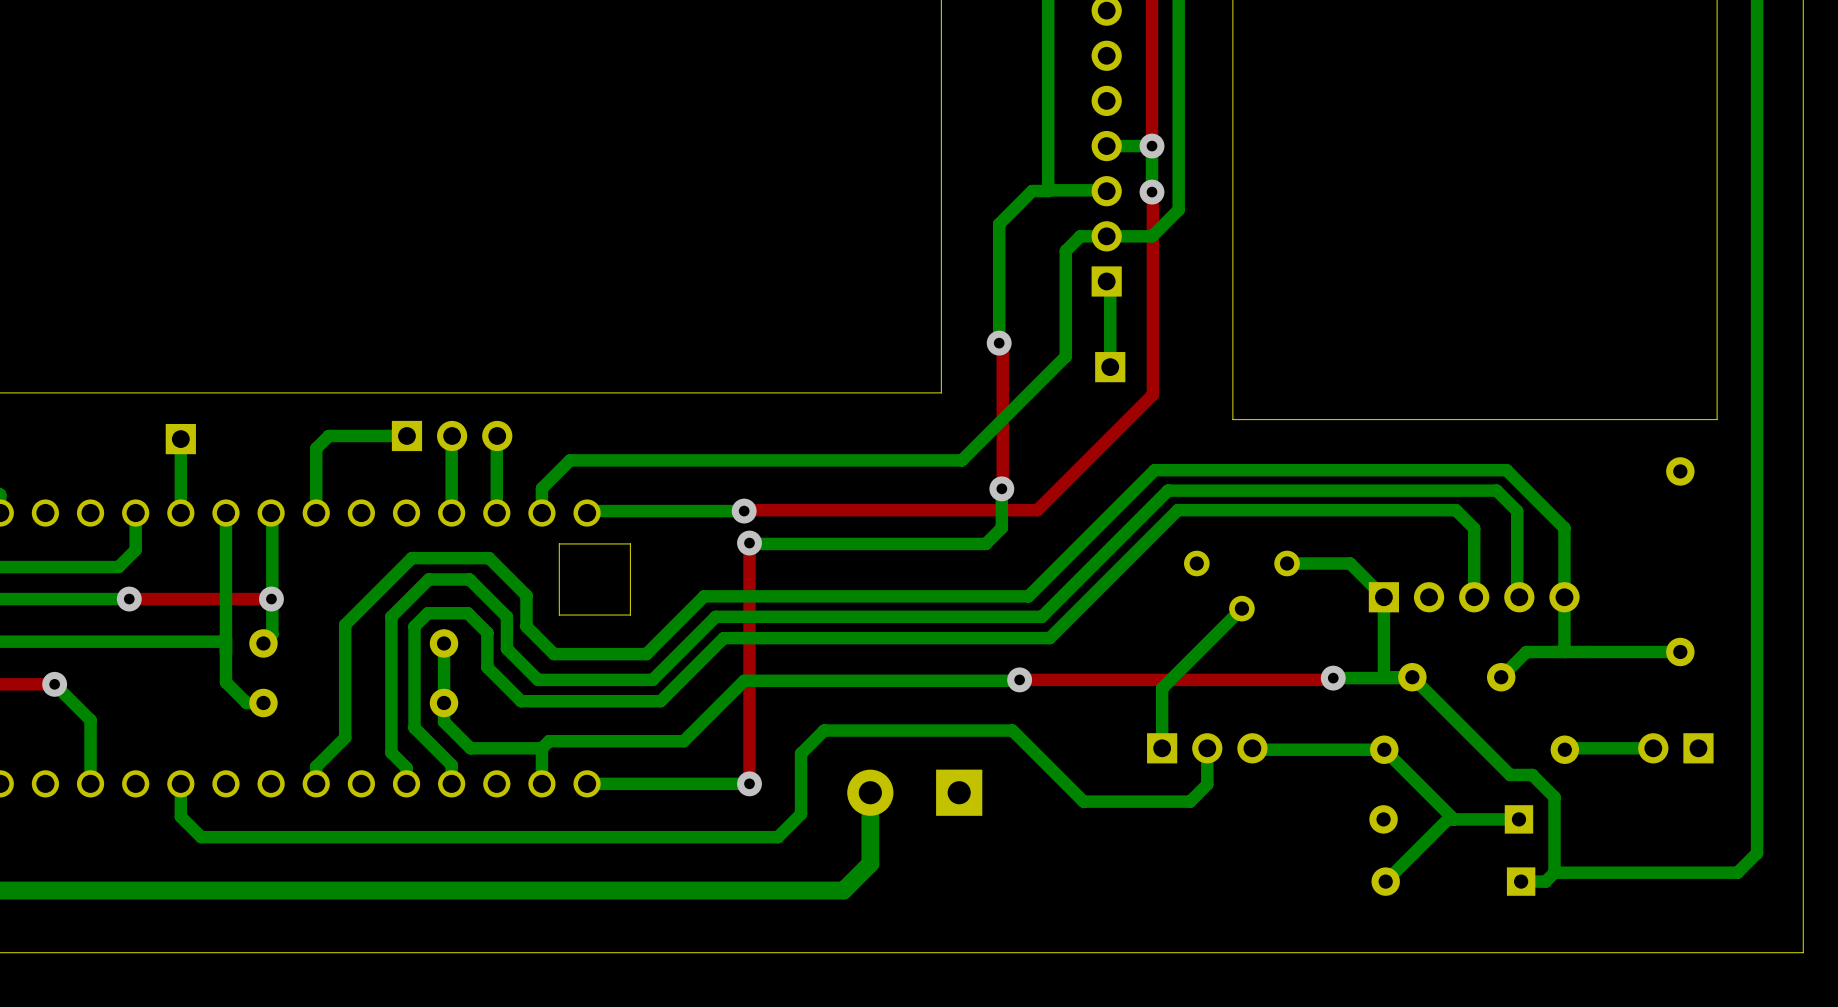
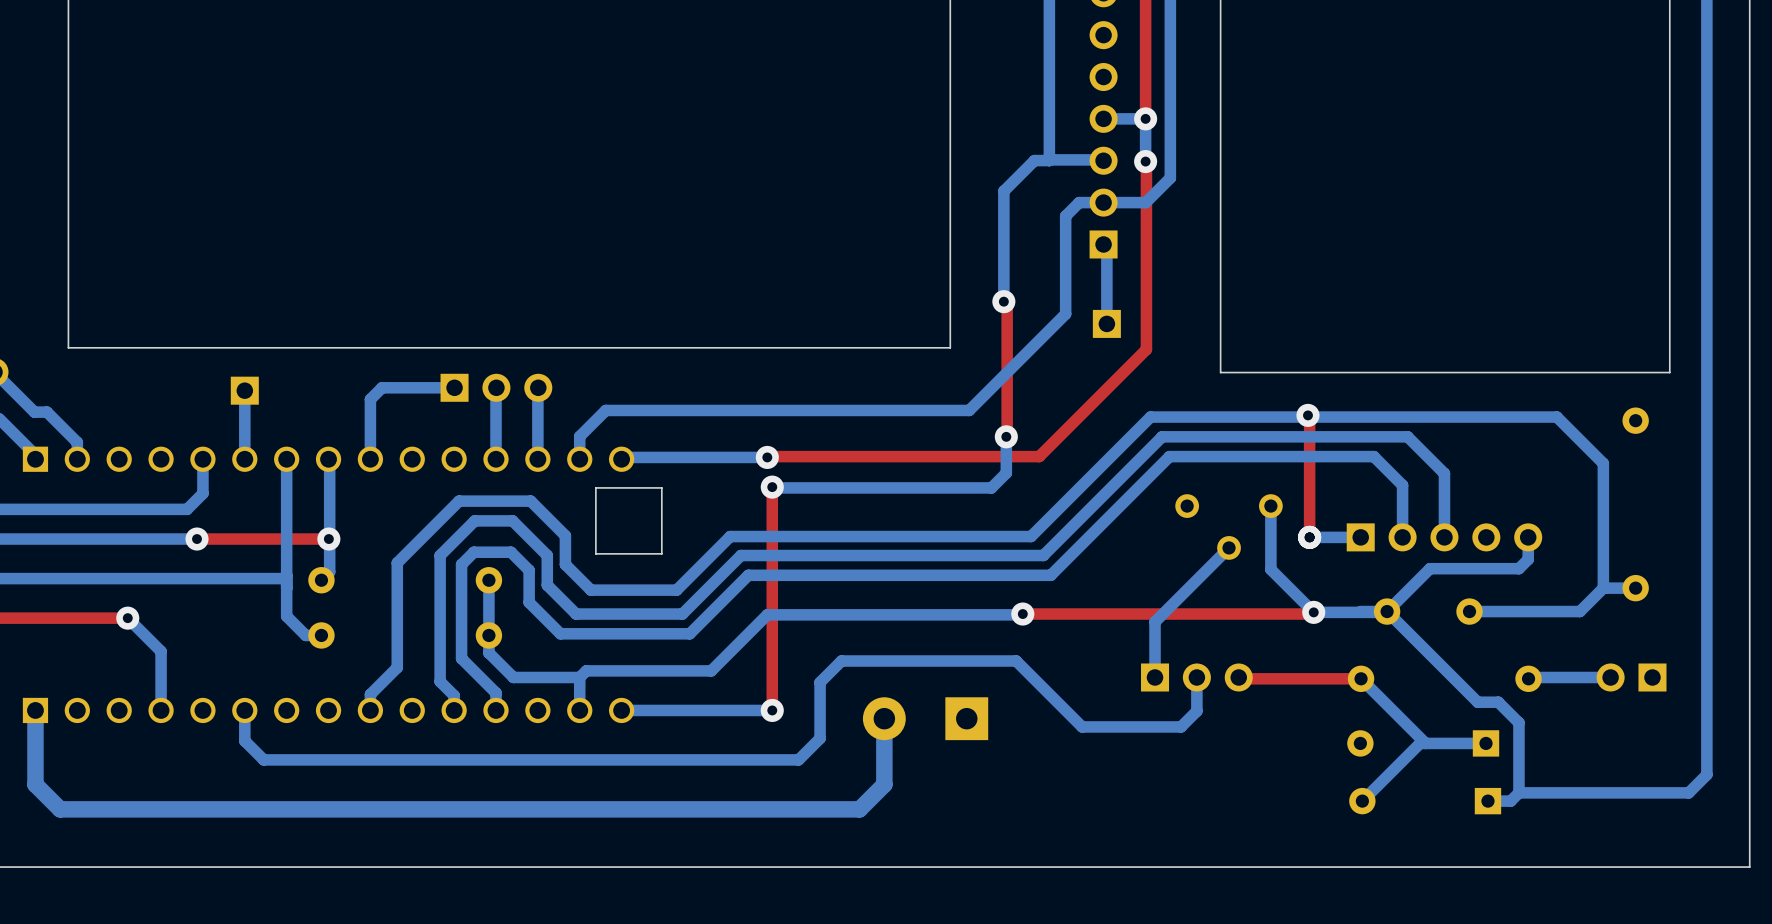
top track: none -> (1307, 415) (1309, 417) (1309, 537)
via: none -> (1307, 415)
bottom track: (1154, 470) (1506, 470) (1564, 528) (1564, 597) -> (1148, 419) (1150, 417) (1556, 417) (1603, 463) (1603, 588) (1579, 611) (1469, 611)
bottom track: (1168, 490) (1496, 490) (1517, 511) (1517, 595) -> (1160, 438) (1162, 436) (1407, 436) (1427, 456)
bottom track: (1455, 510) (1398, 510) -> (1402, 537) (1402, 485) (1373, 456)
bottom track: (1287, 563) (1350, 563) (1383, 597) (1383, 677) -> (1270, 506) (1270, 569) (1313, 612)
via: none -> (1309, 537)
bottom track: none -> (1360, 537) (1309, 537)
bottom track: (1564, 621) (1565, 651) -> (1528, 559) (1518, 568) (1429, 568) (1387, 611)
bottom track: (1645, 651) (1526, 651) (1501, 677) -> none
top track: none -> (1361, 678) (1240, 678)
bottom track: (1384, 749) (1253, 749) -> none

